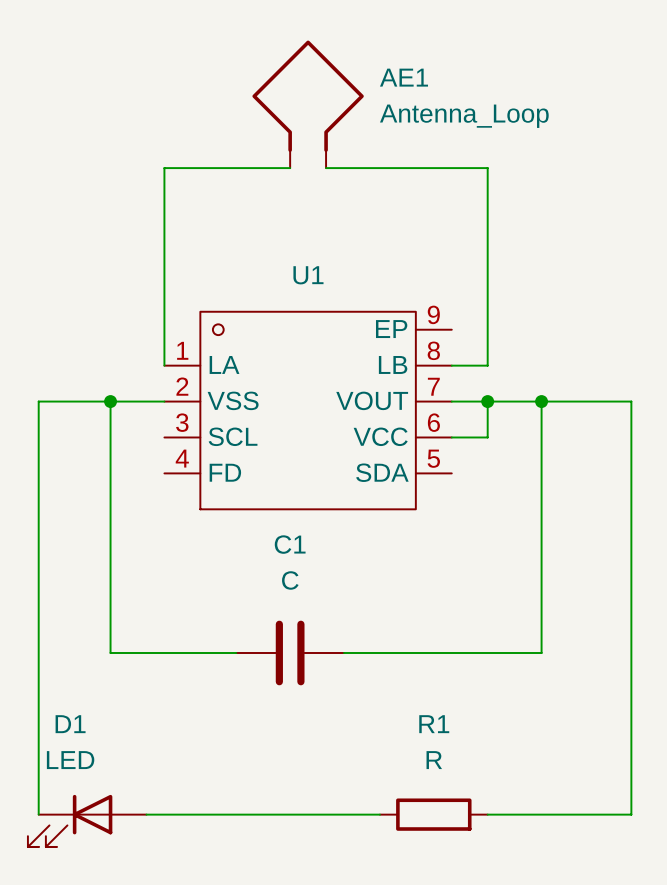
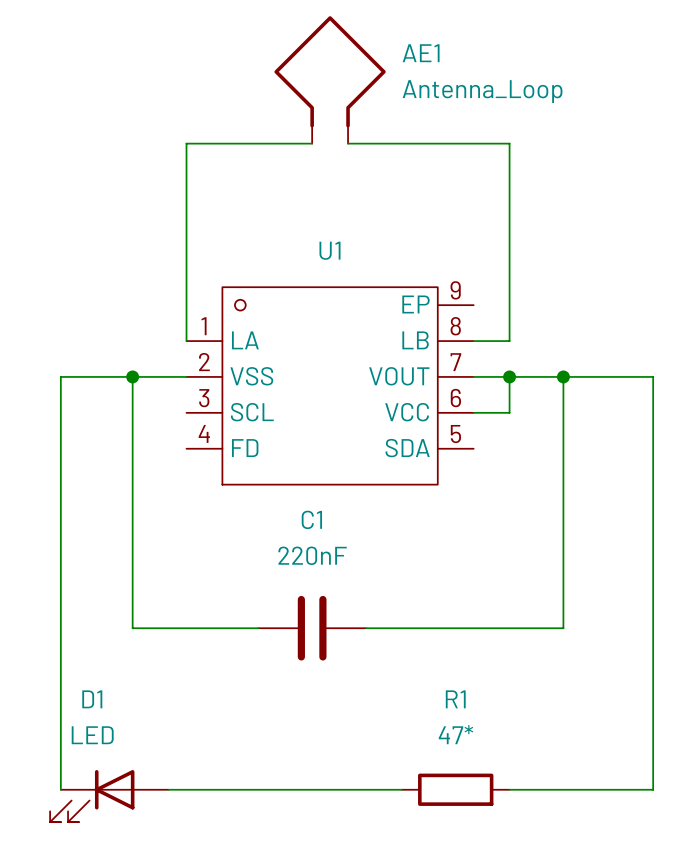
C1 value: C (290, 580) -> 220nF (312, 555)
R1 value: R (434, 760) -> 47* (455, 734)

